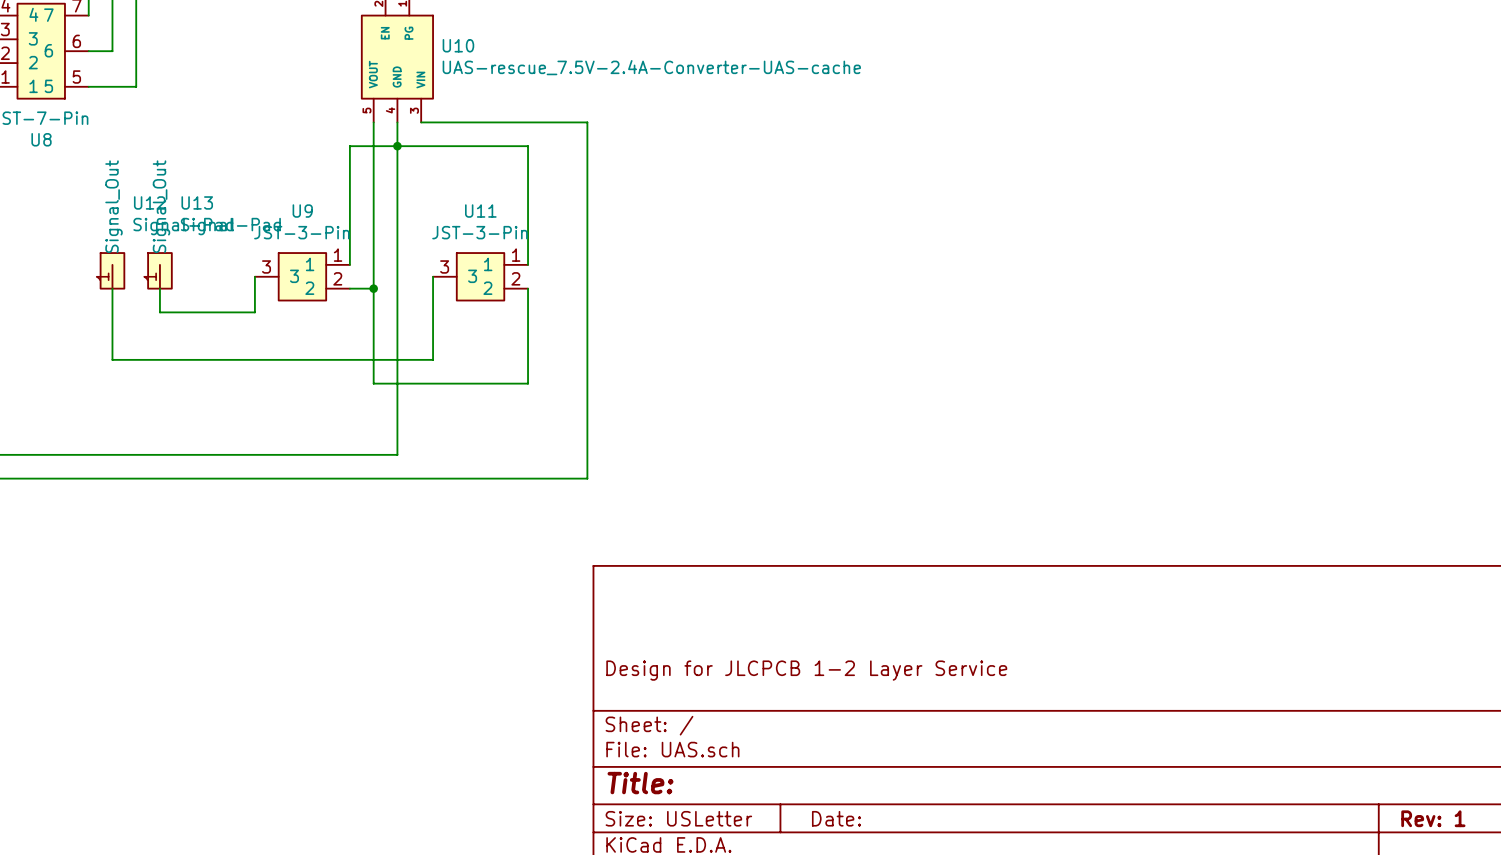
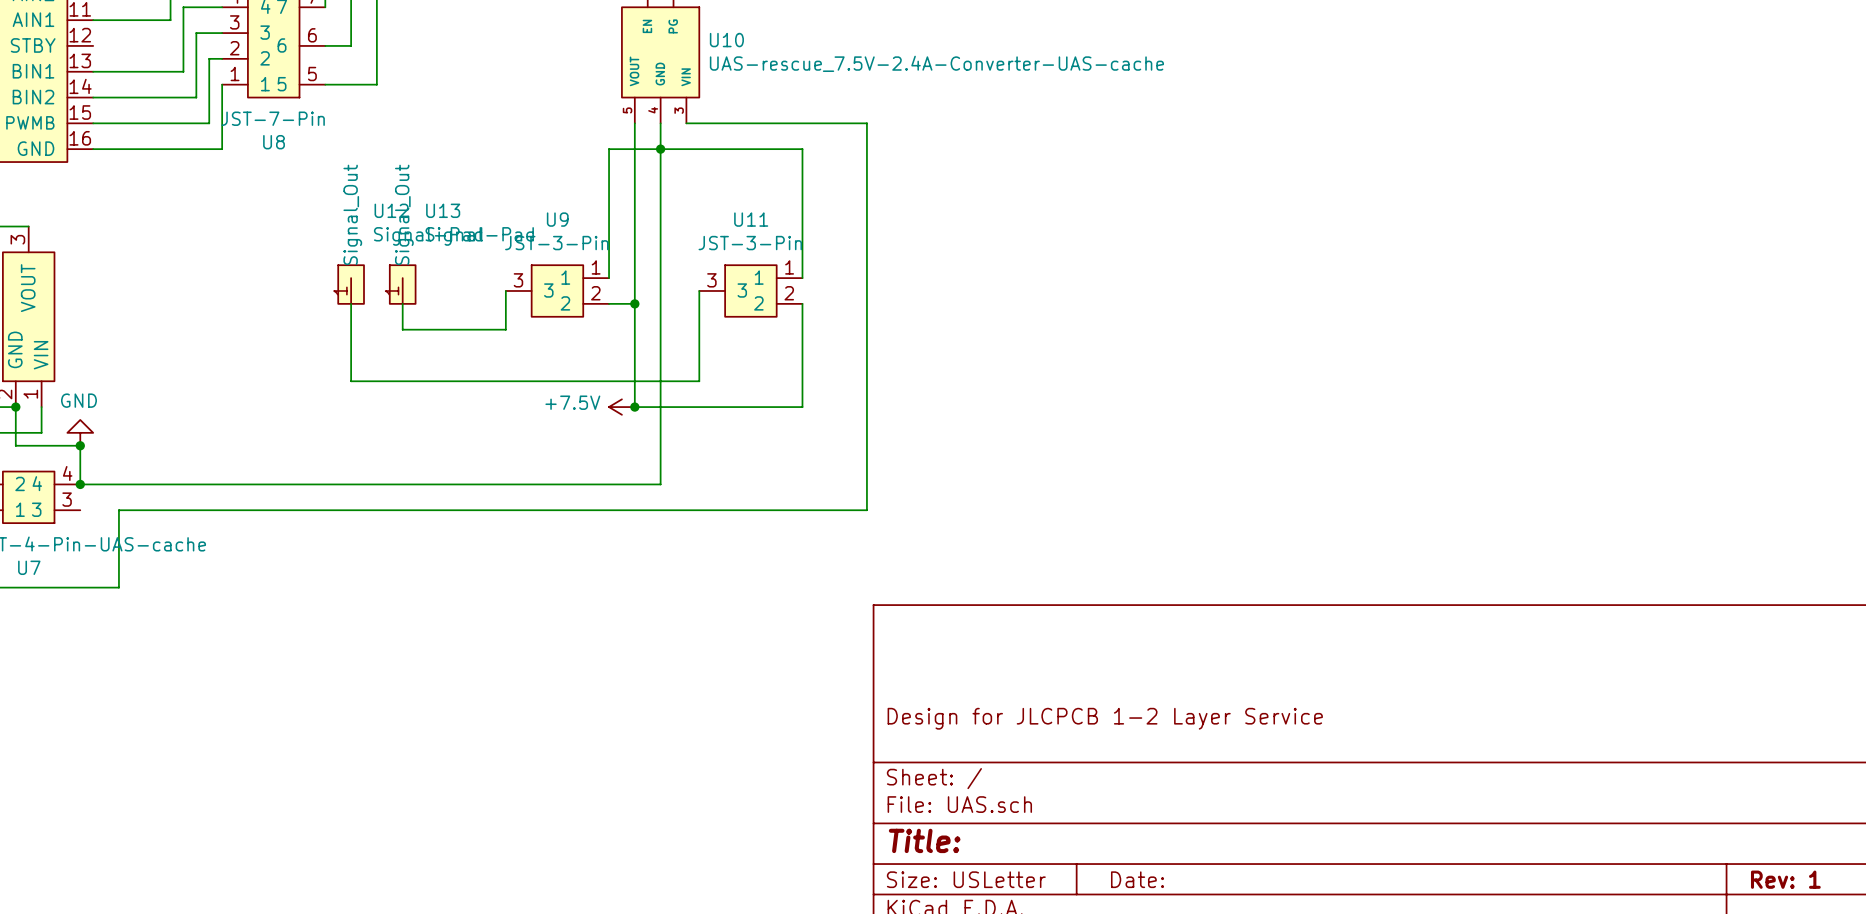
power symbol: none -> +7.5V (621, 407)
junction: none -> (634, 407)

